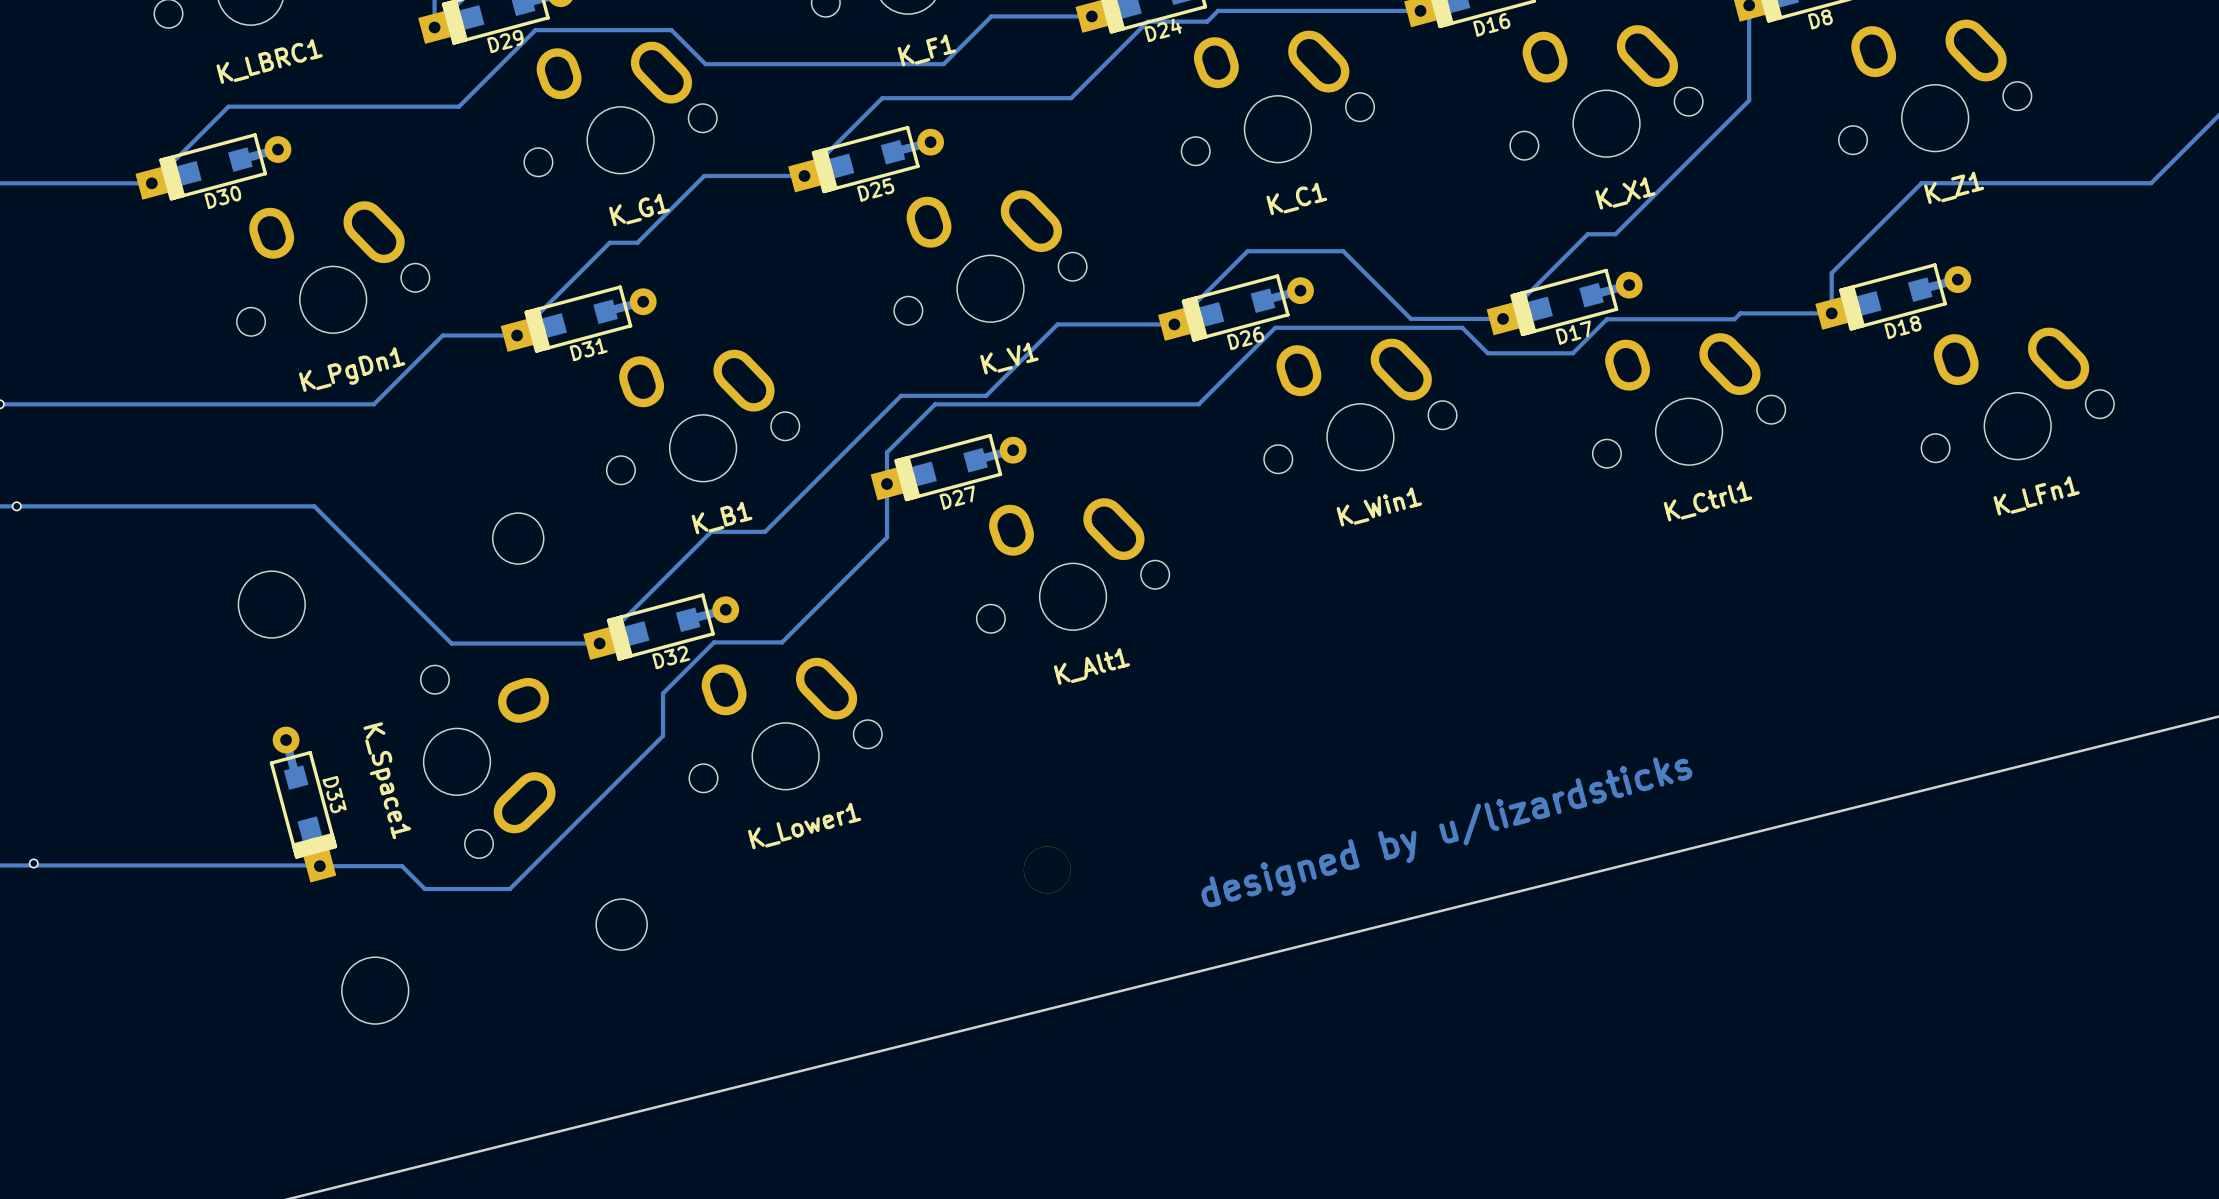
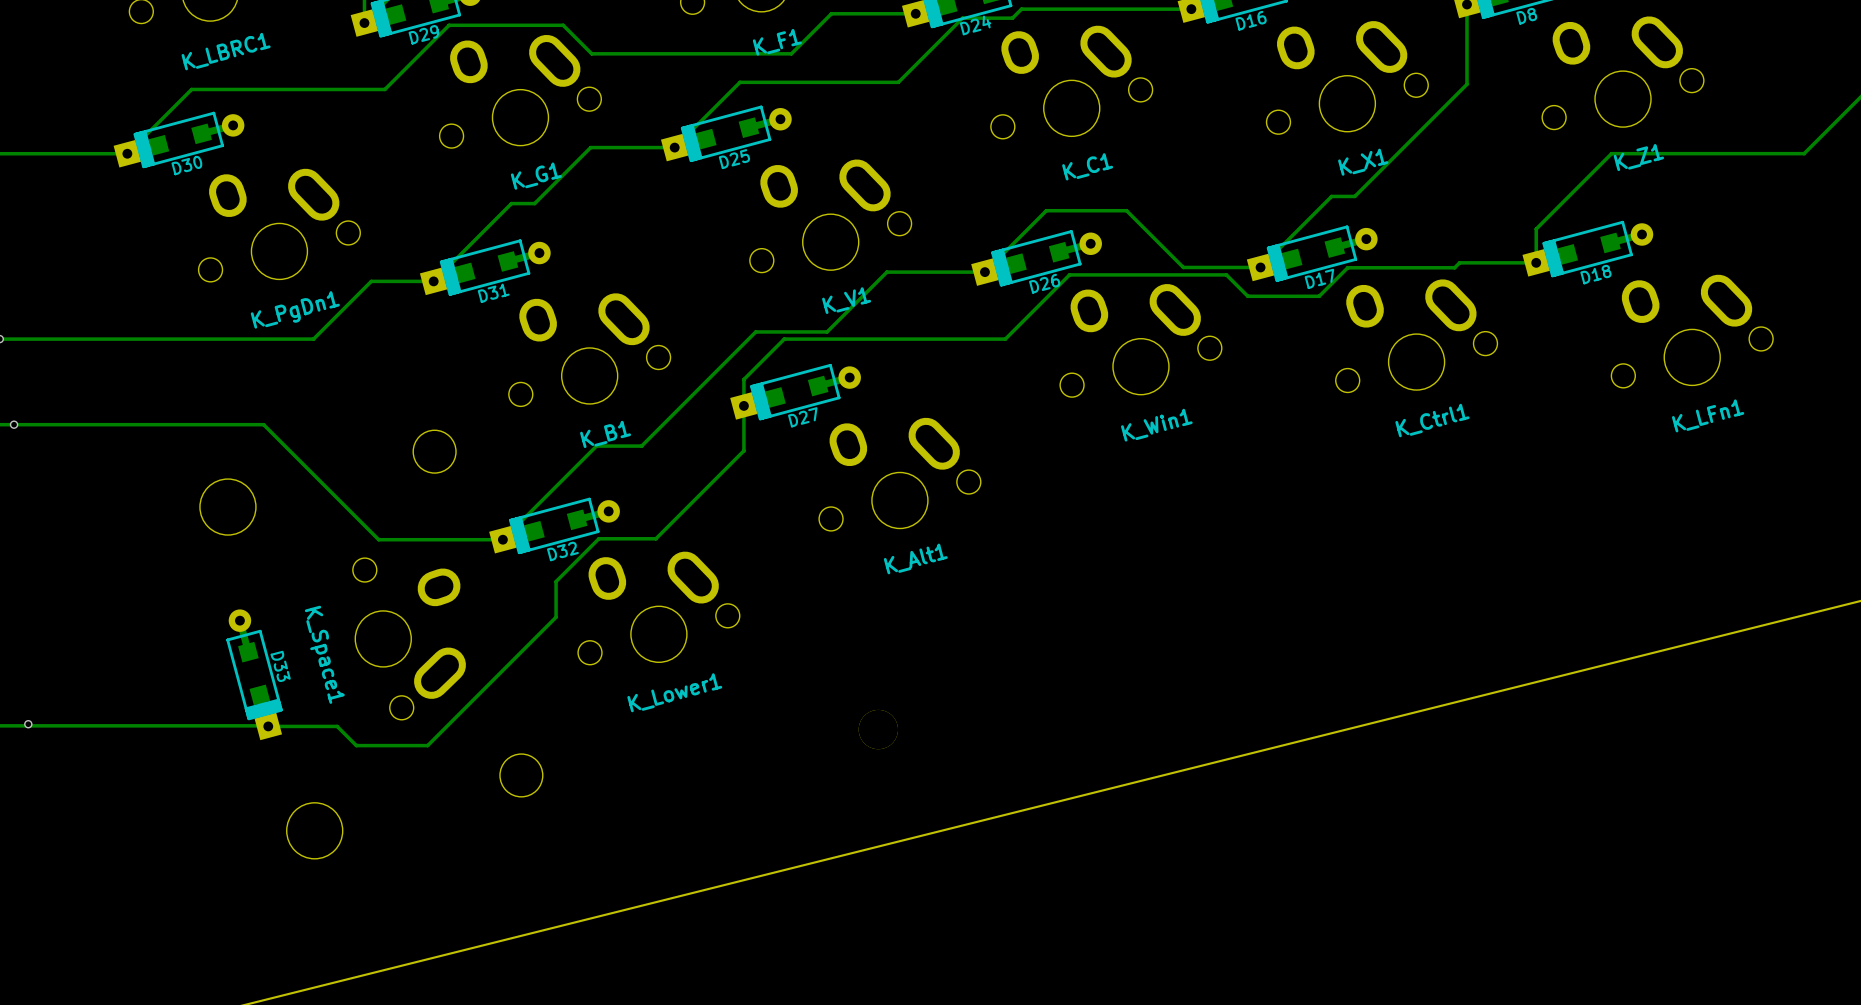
text: designed by u/lizardsticks (1446, 832) -> none

